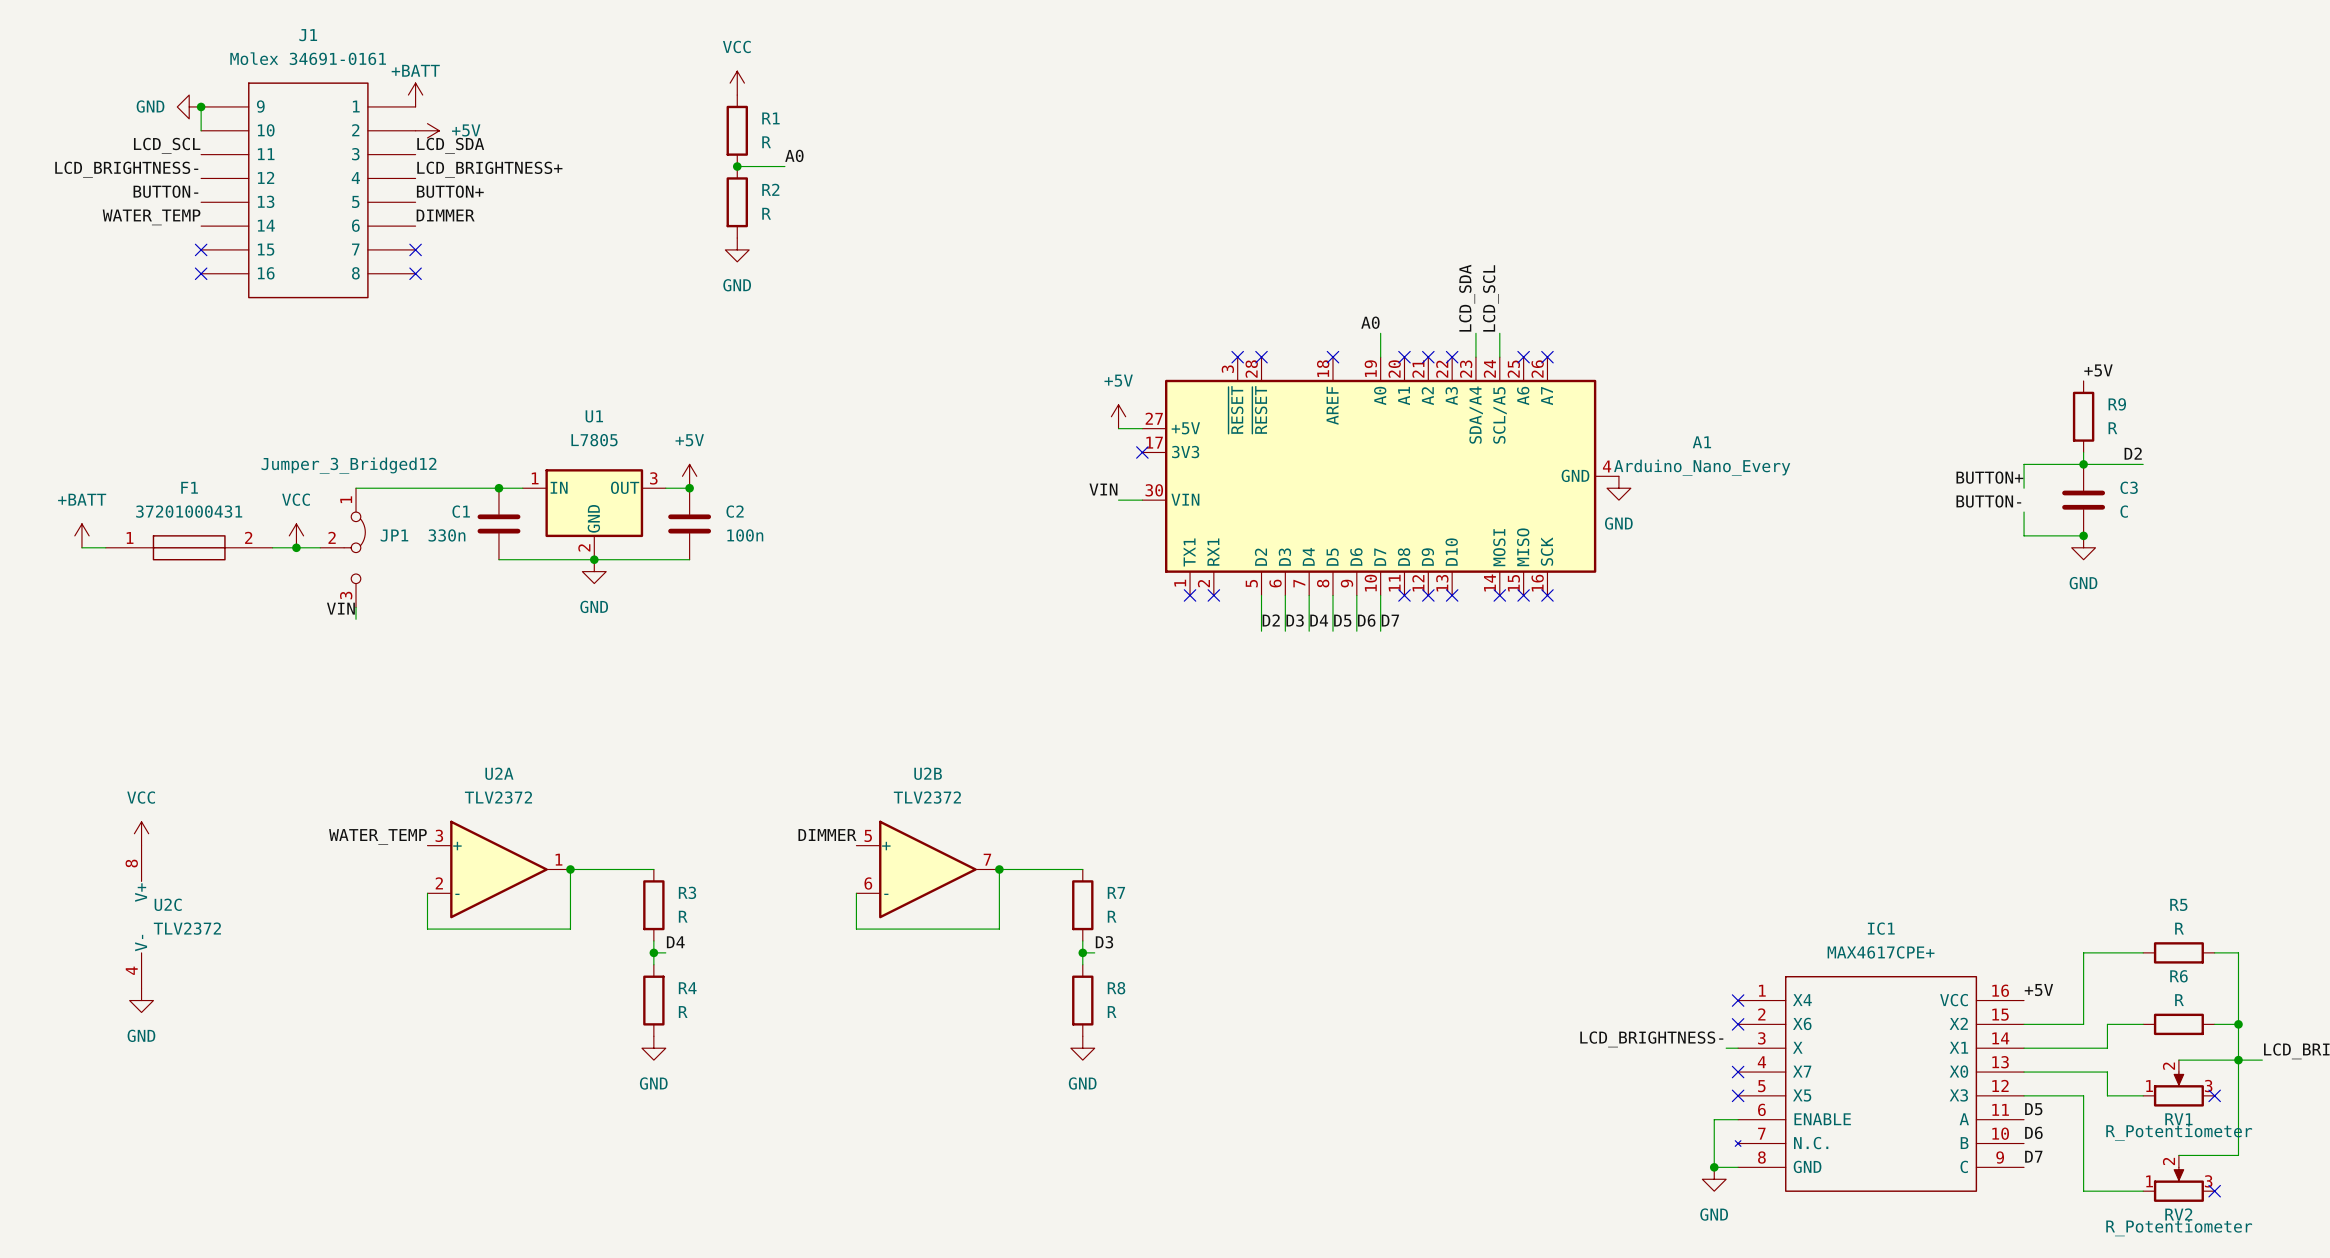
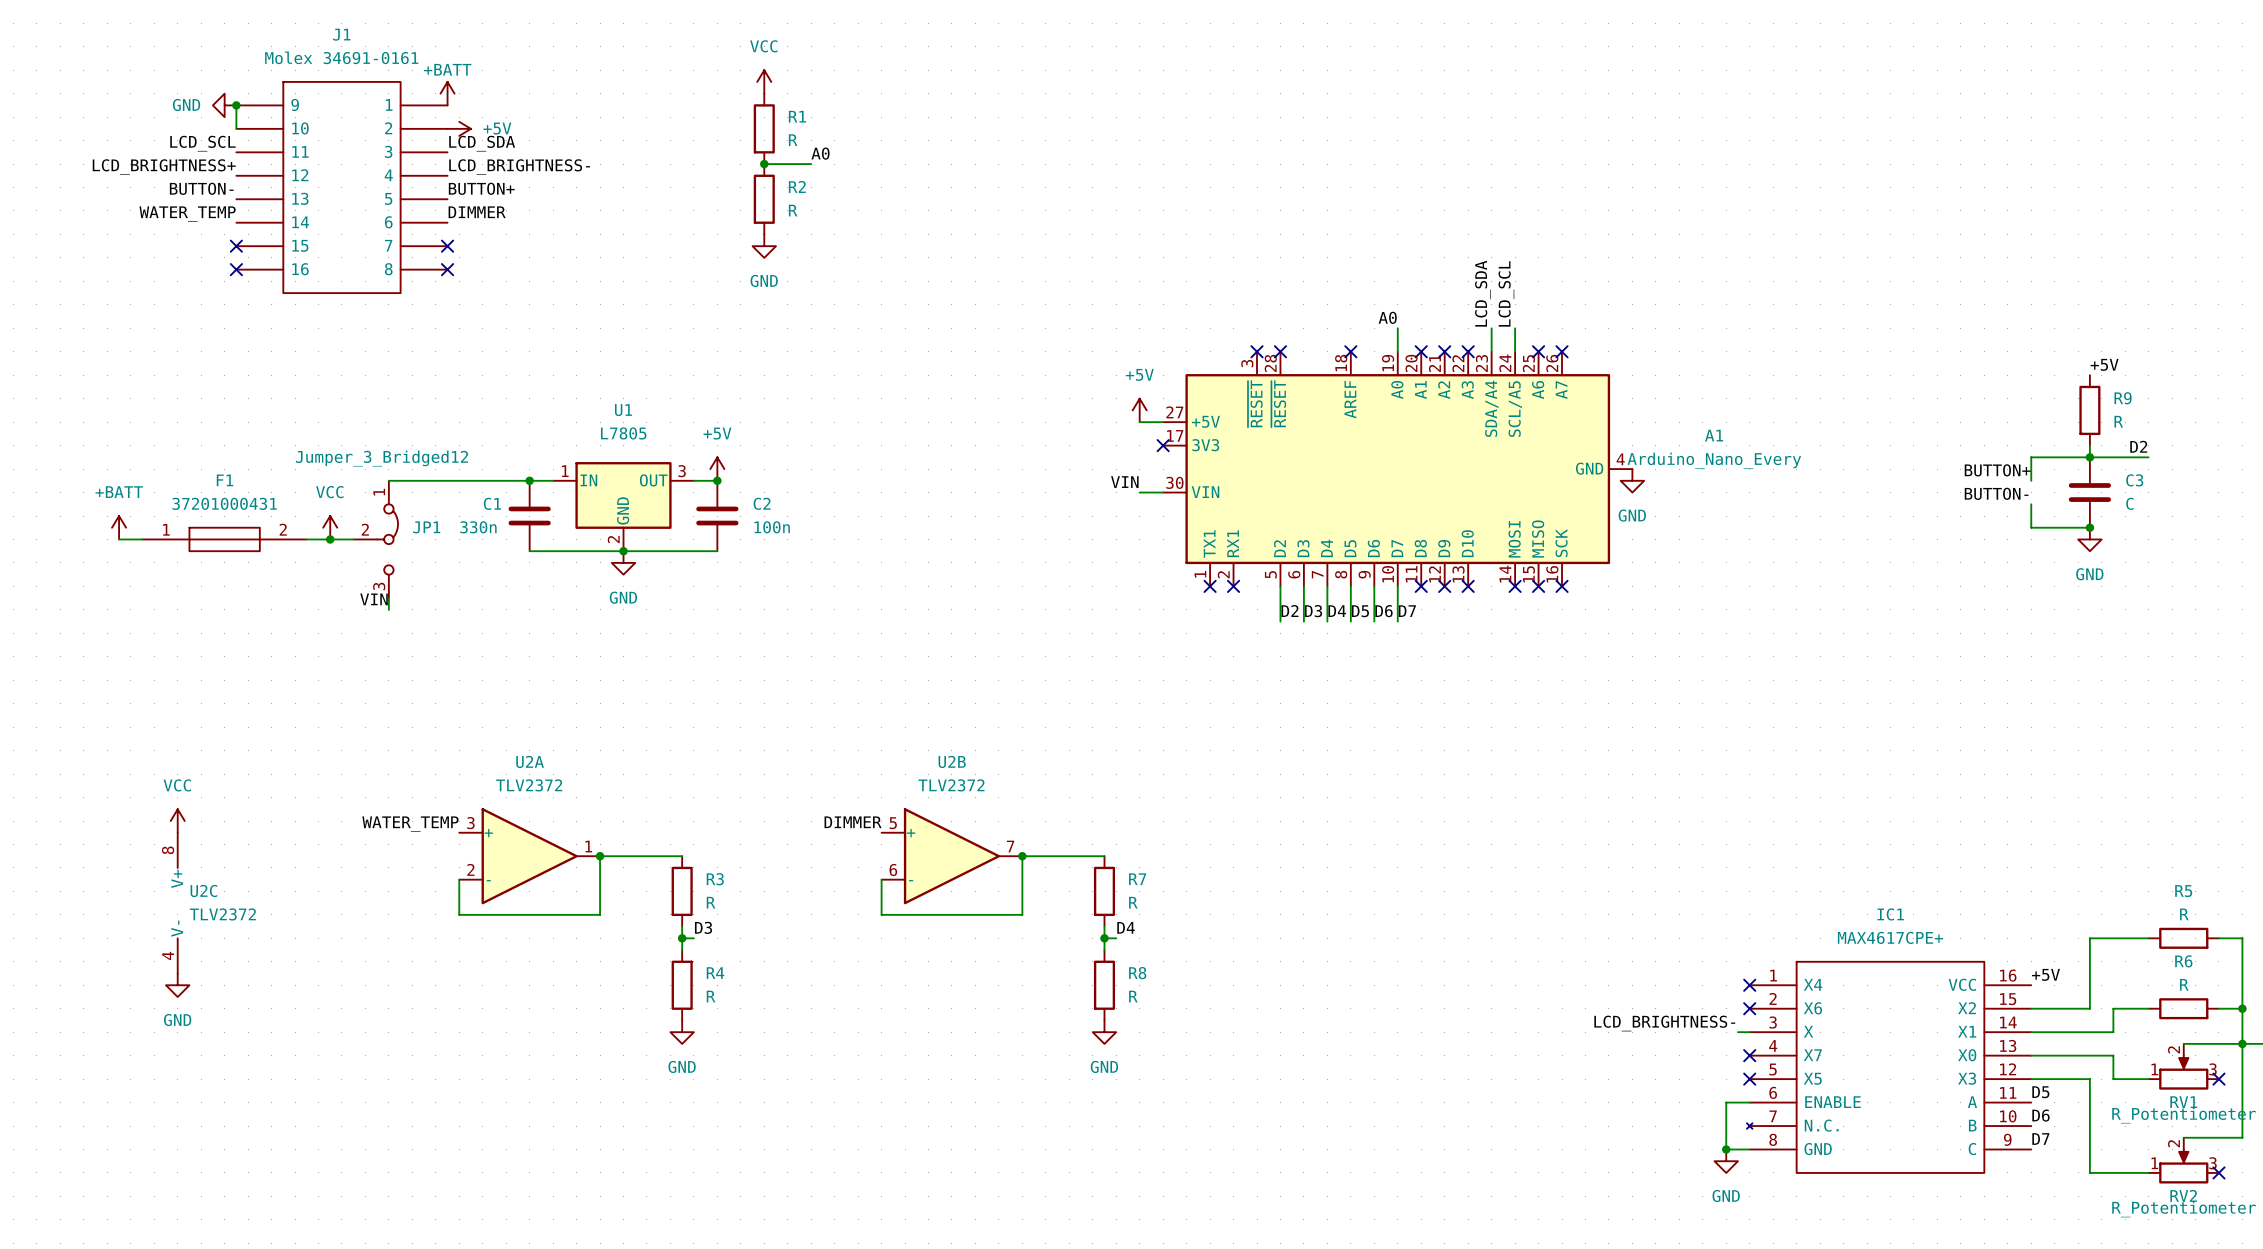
label: LCD_BRIGHTNESS- (126, 169) -> LCD_BRIGHTNESS+ (164, 167)
label: LCD_BRIGHTNESS+ (489, 169) -> LCD_BRIGHTNESS- (519, 167)
label: D4 (675, 942) -> D3 (703, 927)
label: D3 (1104, 942) -> D4 (1126, 927)

